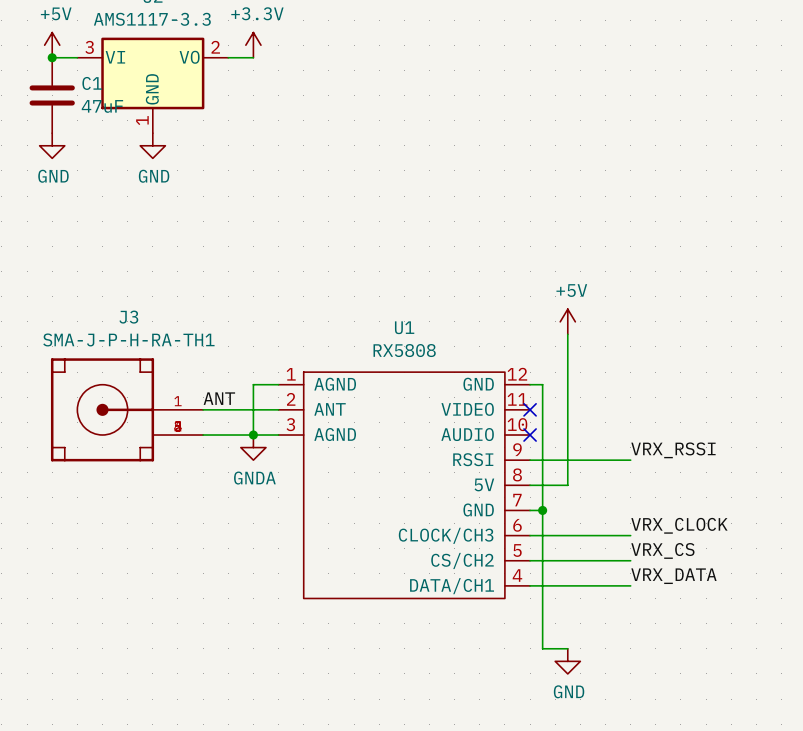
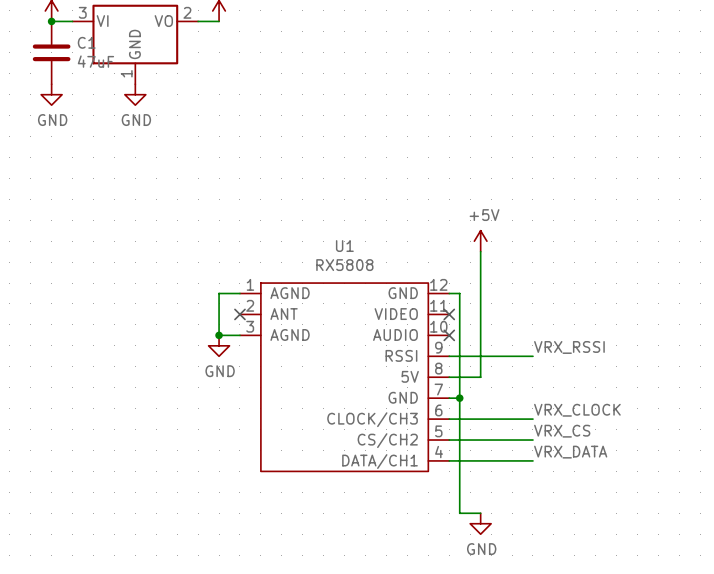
label: ANT (219, 398) -> none
J3: SMA-J-P-H-RA-TH1 (127, 409) -> none
wire: (203, 409) (278, 409) -> none
no-connect mark: none -> (239, 314)
wire: (203, 435) (253, 435) -> none
power symbol: GNDA (253, 447) -> GND (219, 345)

